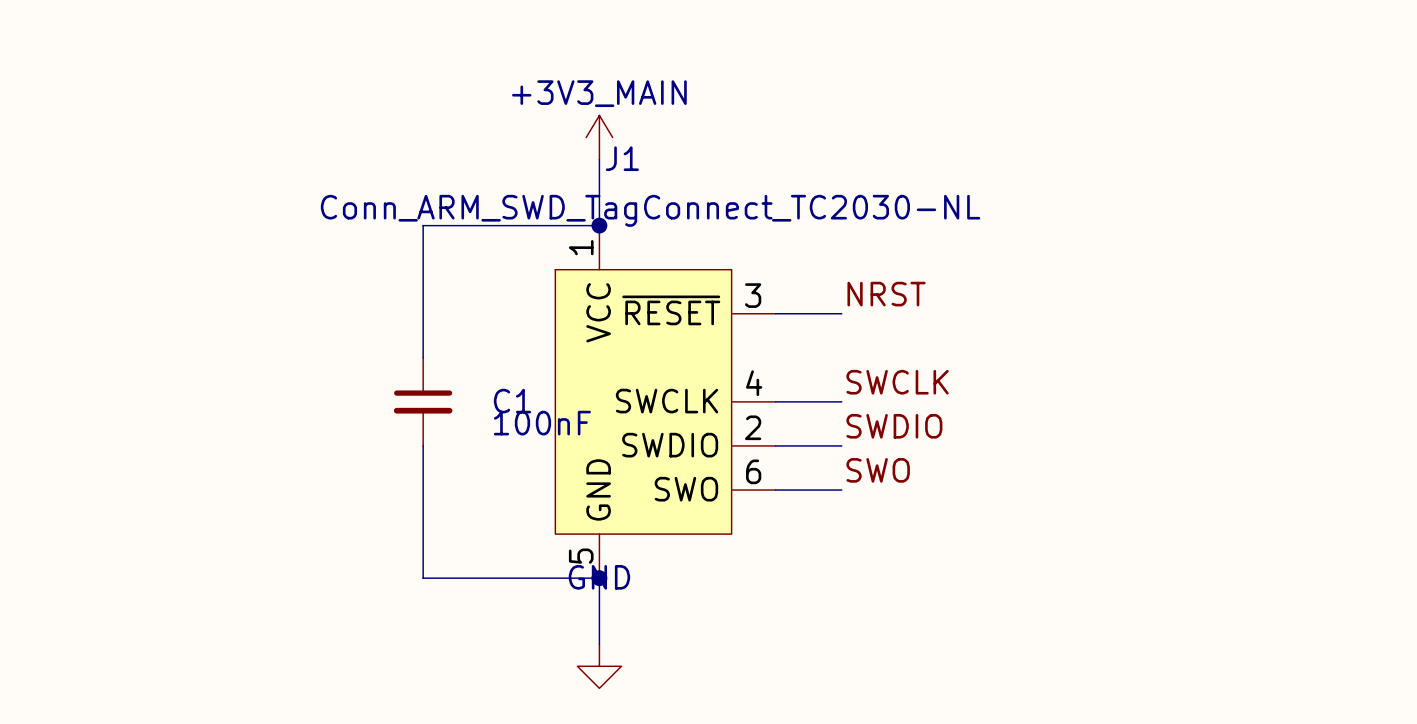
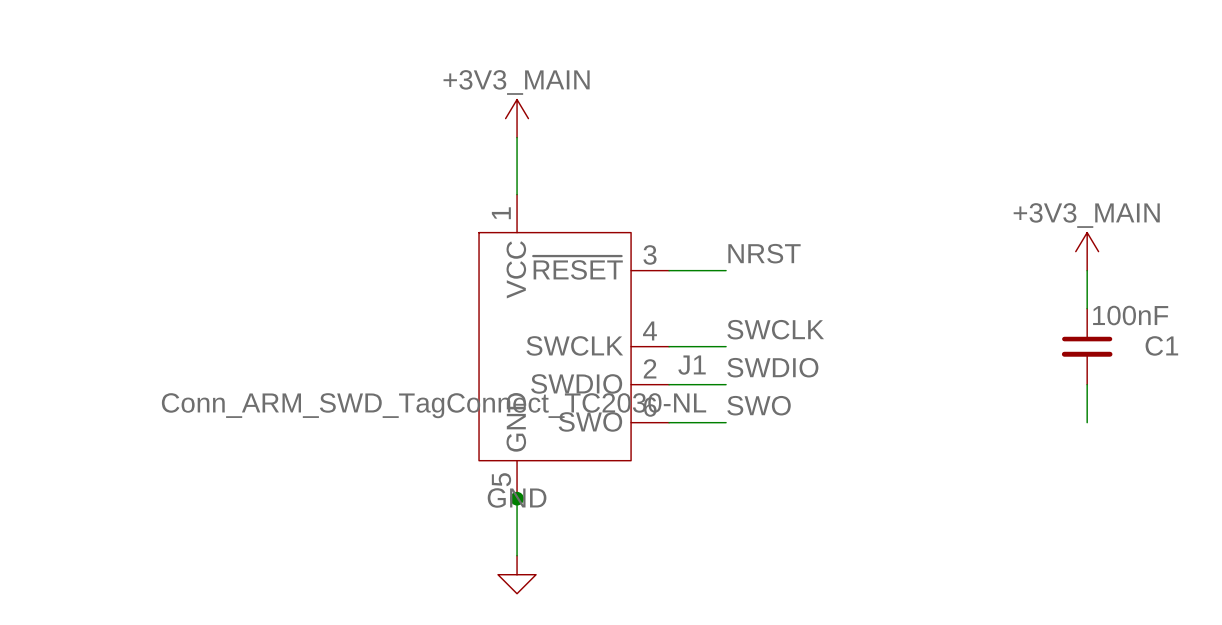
J1 name position: J1 (622, 158) -> J1 (692, 365)
J1 value position: Conn_ARM_SWD_TagConnect_TC2030-NL (650, 210) -> Conn_ARM_SWD_TagConnect_TC2030-NL (434, 405)
wire: (599, 225) (423, 225) (423, 357) -> none
junction: (599, 225) -> none
power symbol: none -> +3V3_MAIN (1087, 251)
wire: none -> (1087, 270) (1087, 308)
C1 position: (423, 401) -> (1087, 346)
C1 value position: 100nF (542, 423) -> 100nF (1130, 315)
wire: (423, 445) (423, 578) (599, 578) -> none
wire: none -> (1087, 384) (1087, 422)

